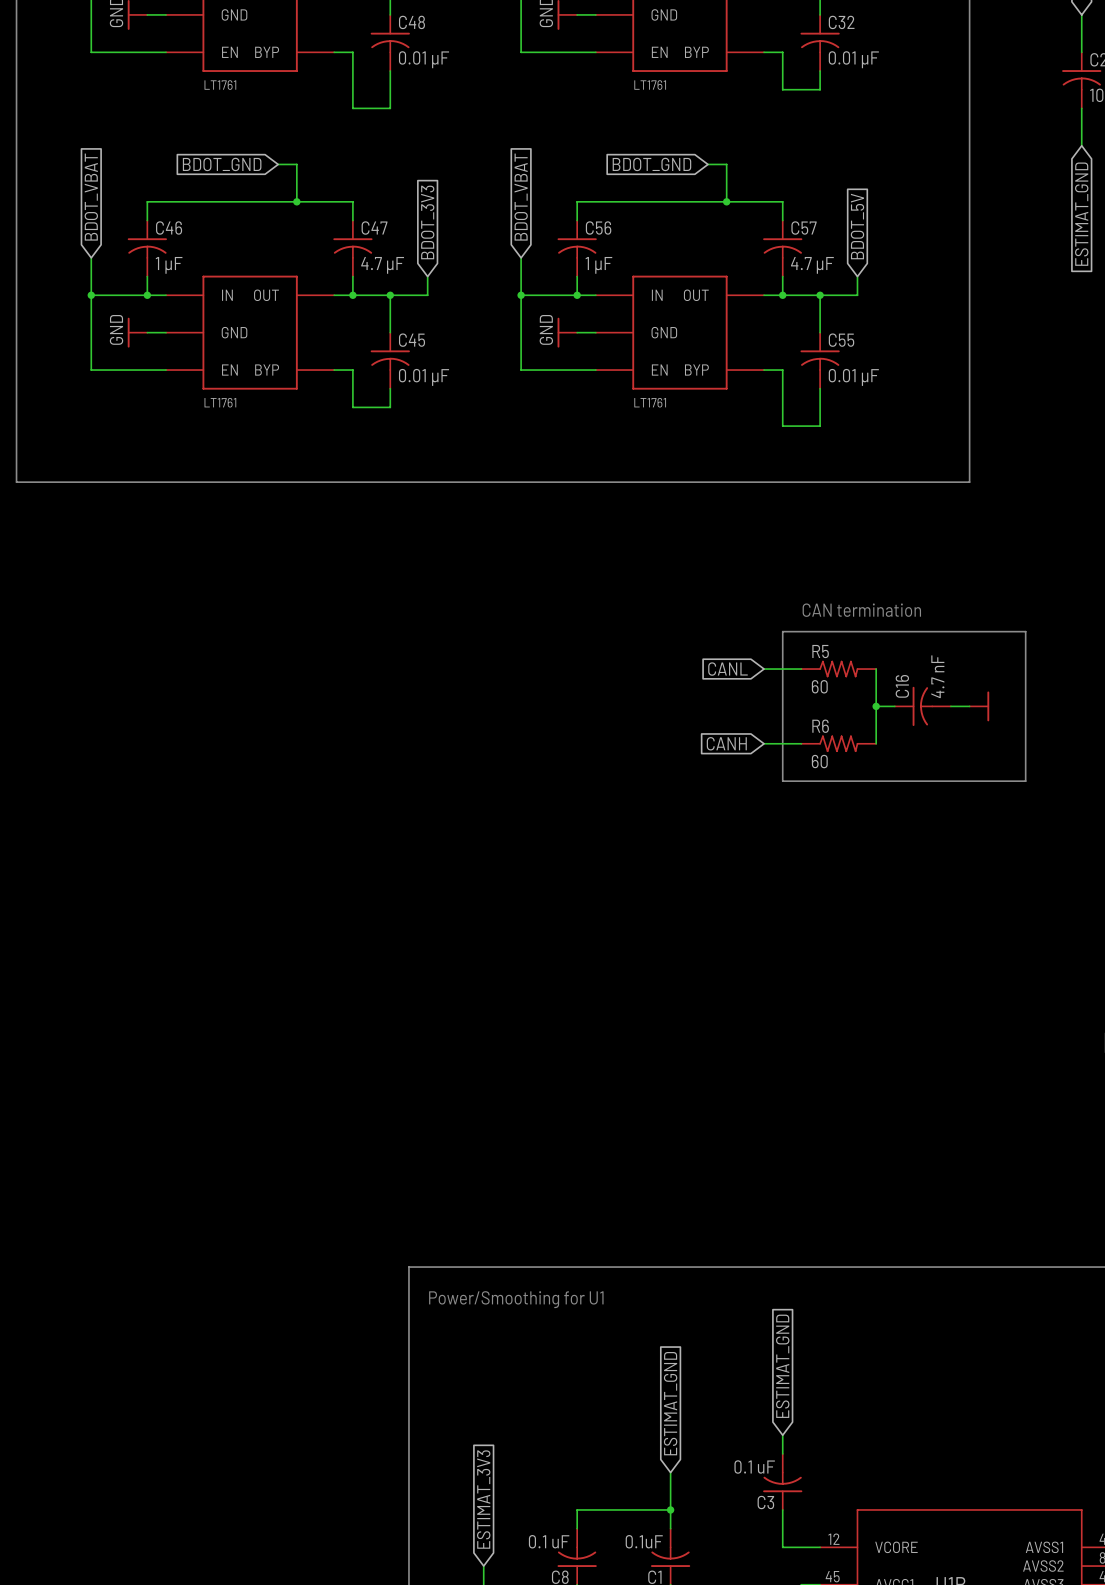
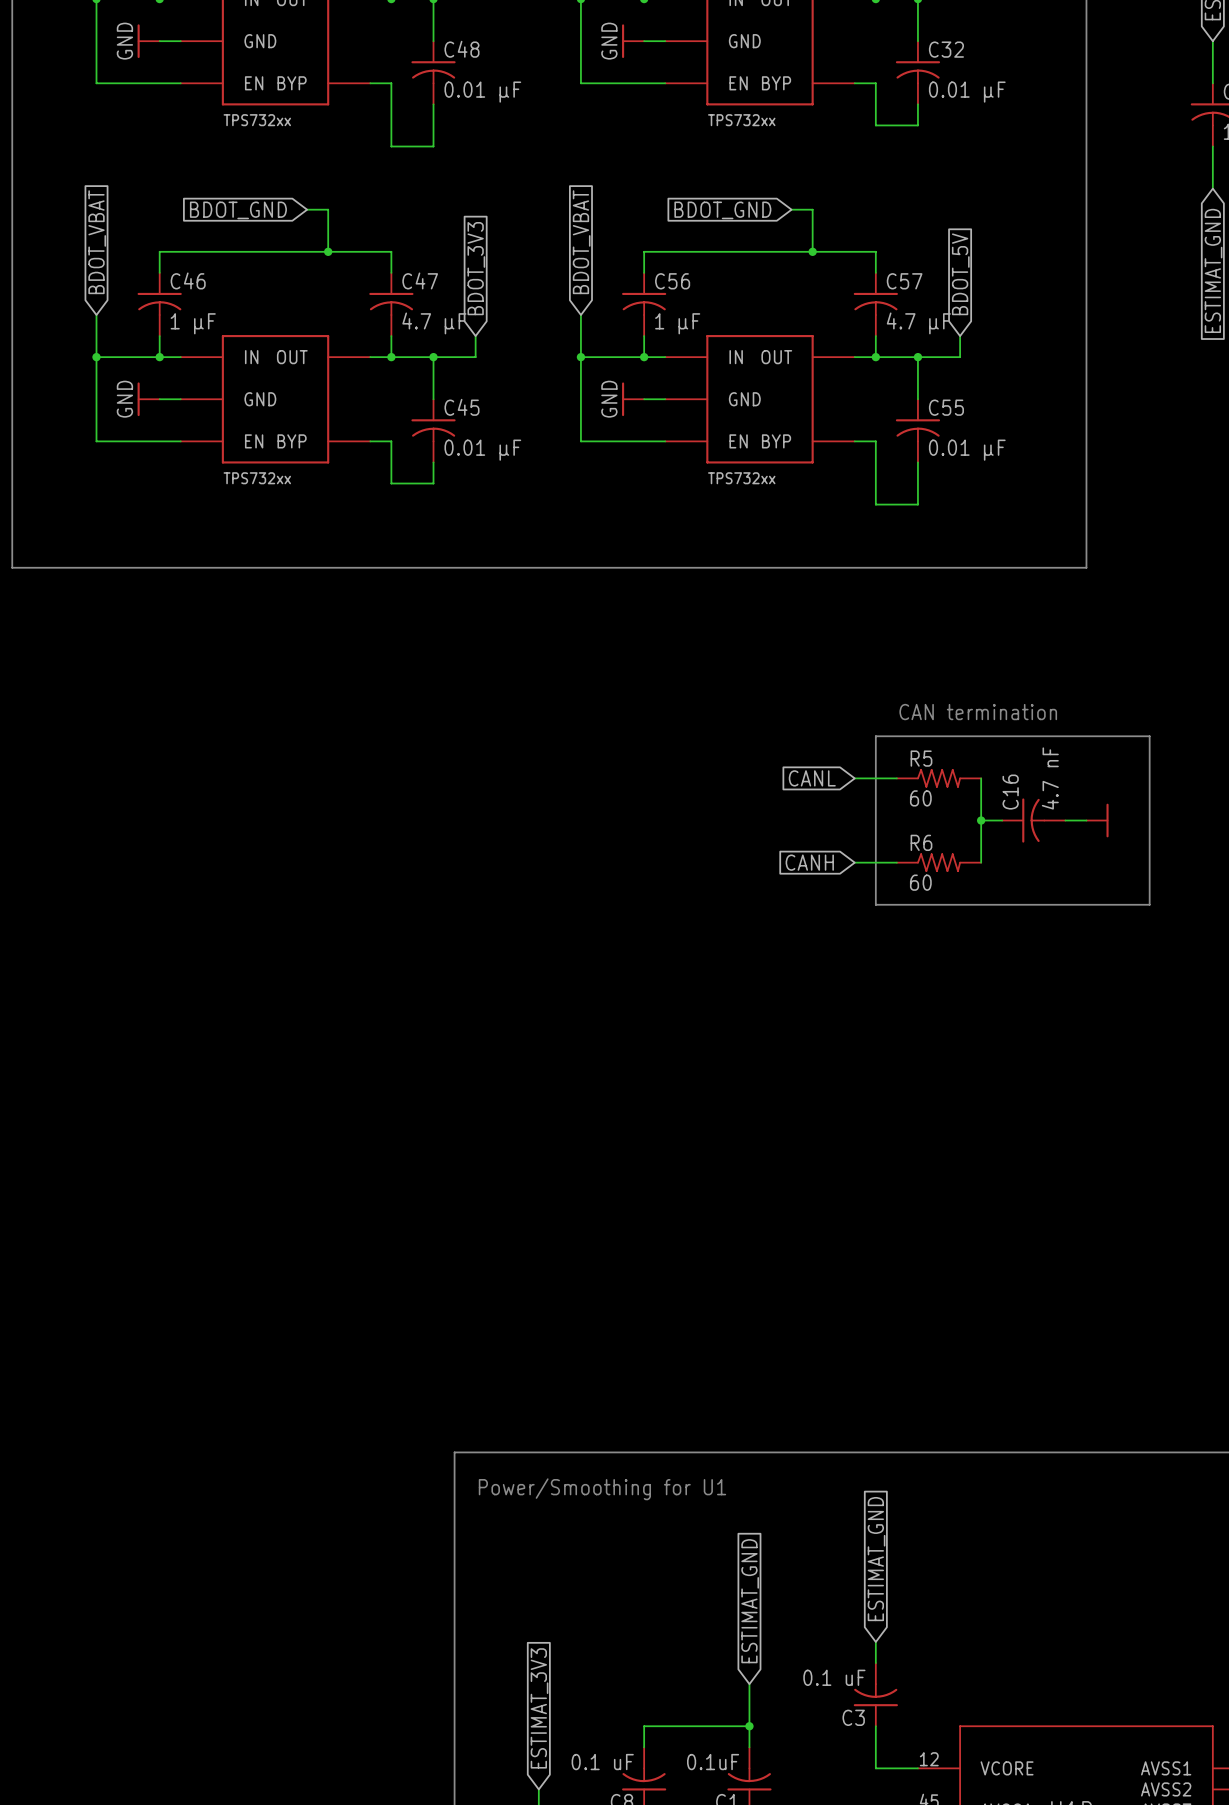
part text: LT1761 (220, 85) -> TPS732xx (257, 120)
part text: LT1761 (650, 85) -> TPS732xx (741, 120)
part text: LT1761 (220, 402) -> TPS732xx (257, 478)
part text: LT1761 (650, 402) -> TPS732xx (741, 478)

